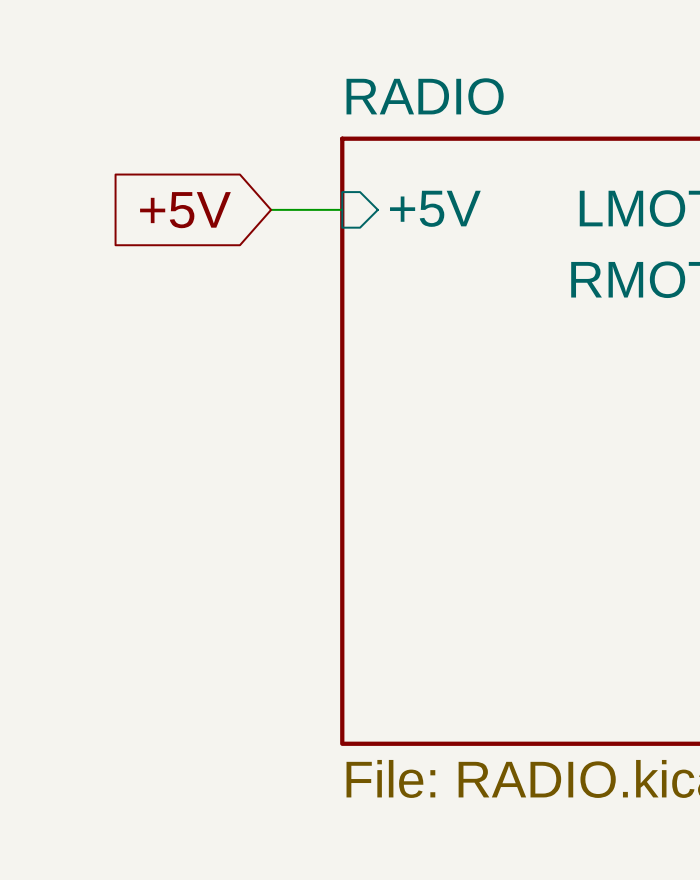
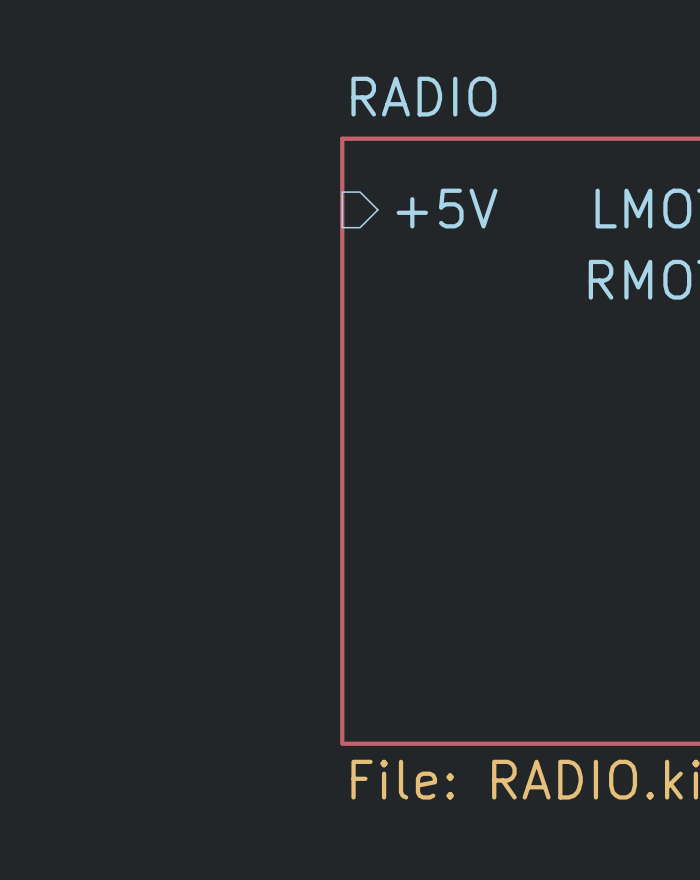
wire: (271, 209) (342, 209) -> none
global label: +5V (185, 210) -> none

